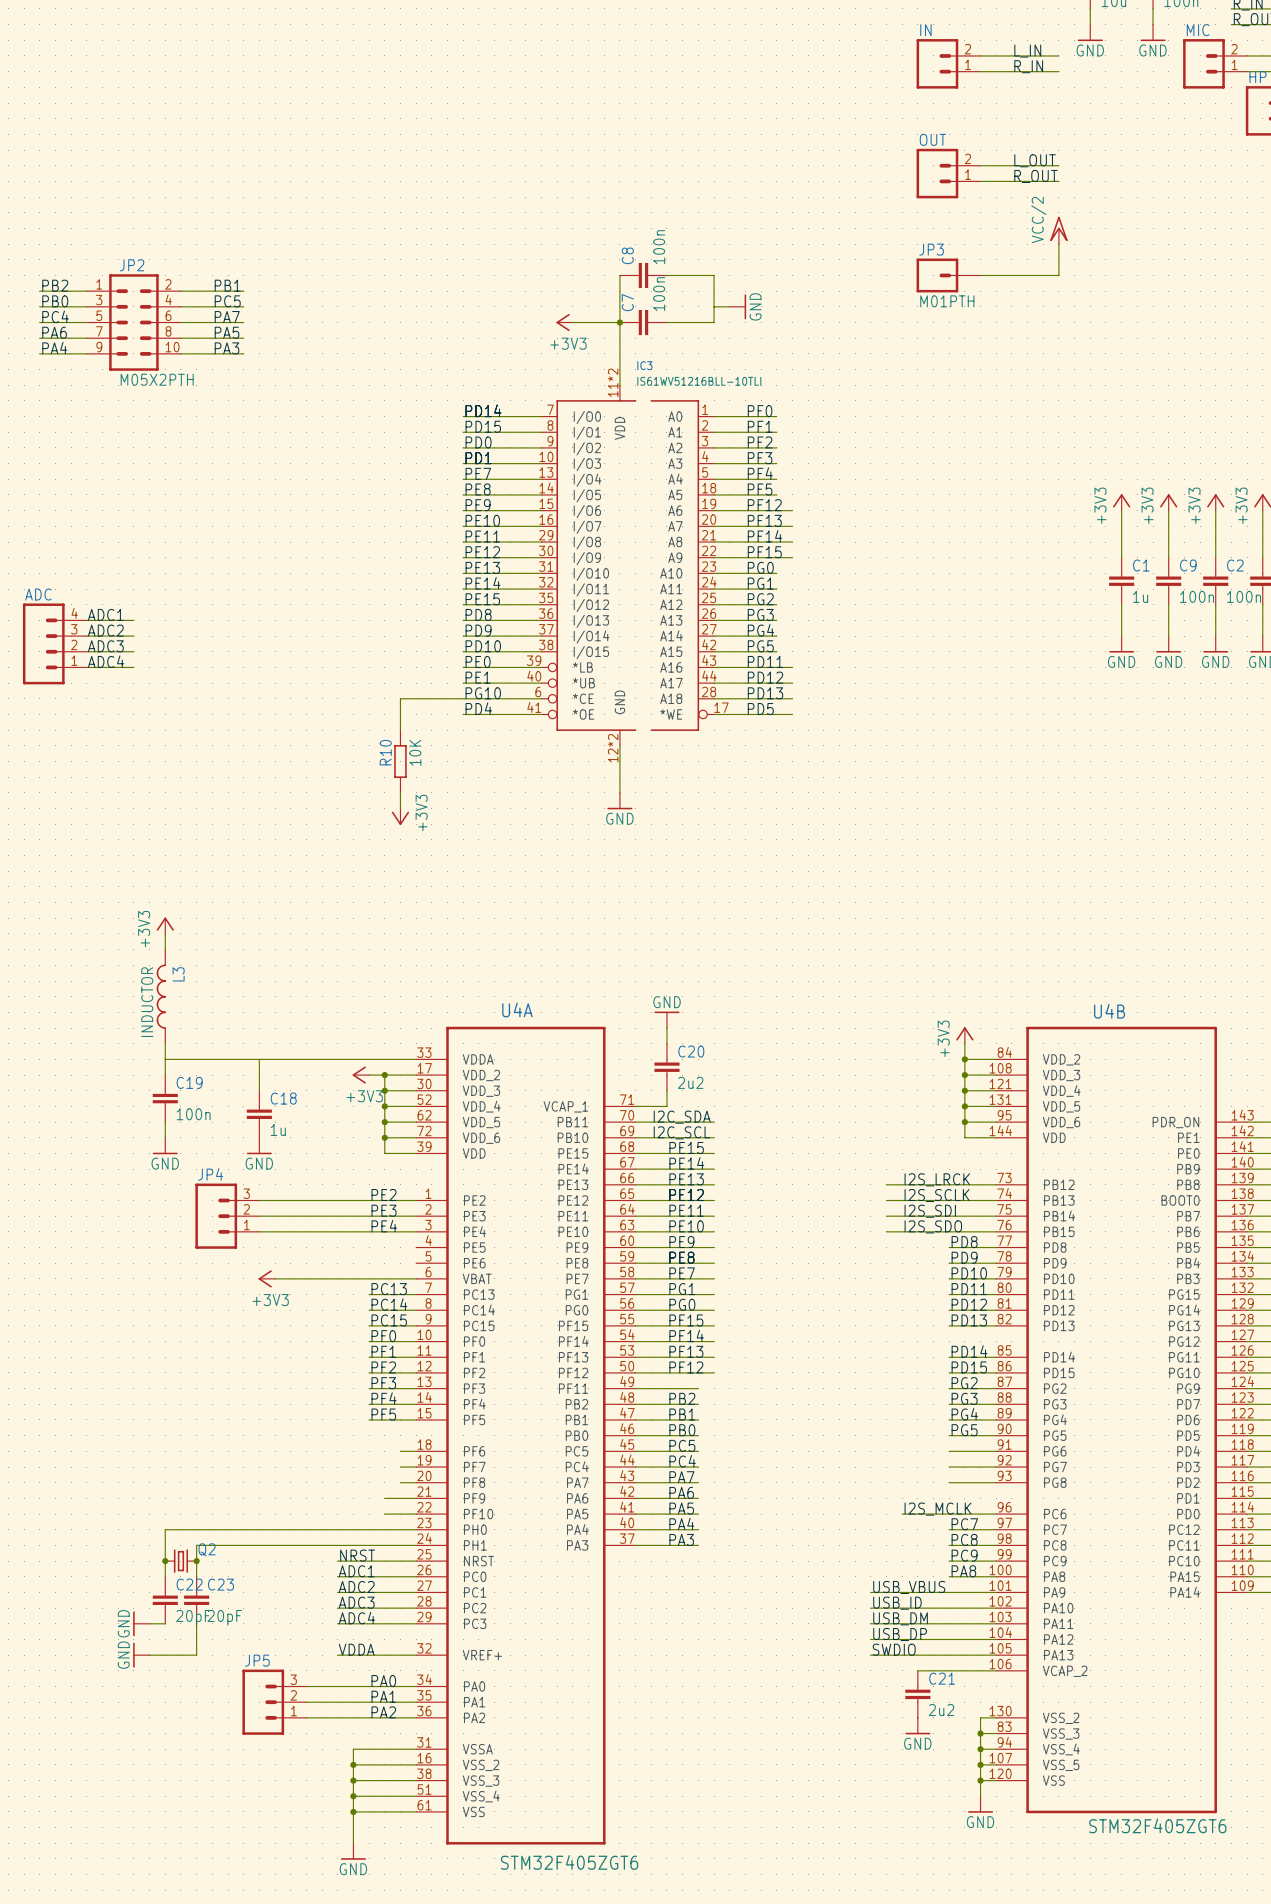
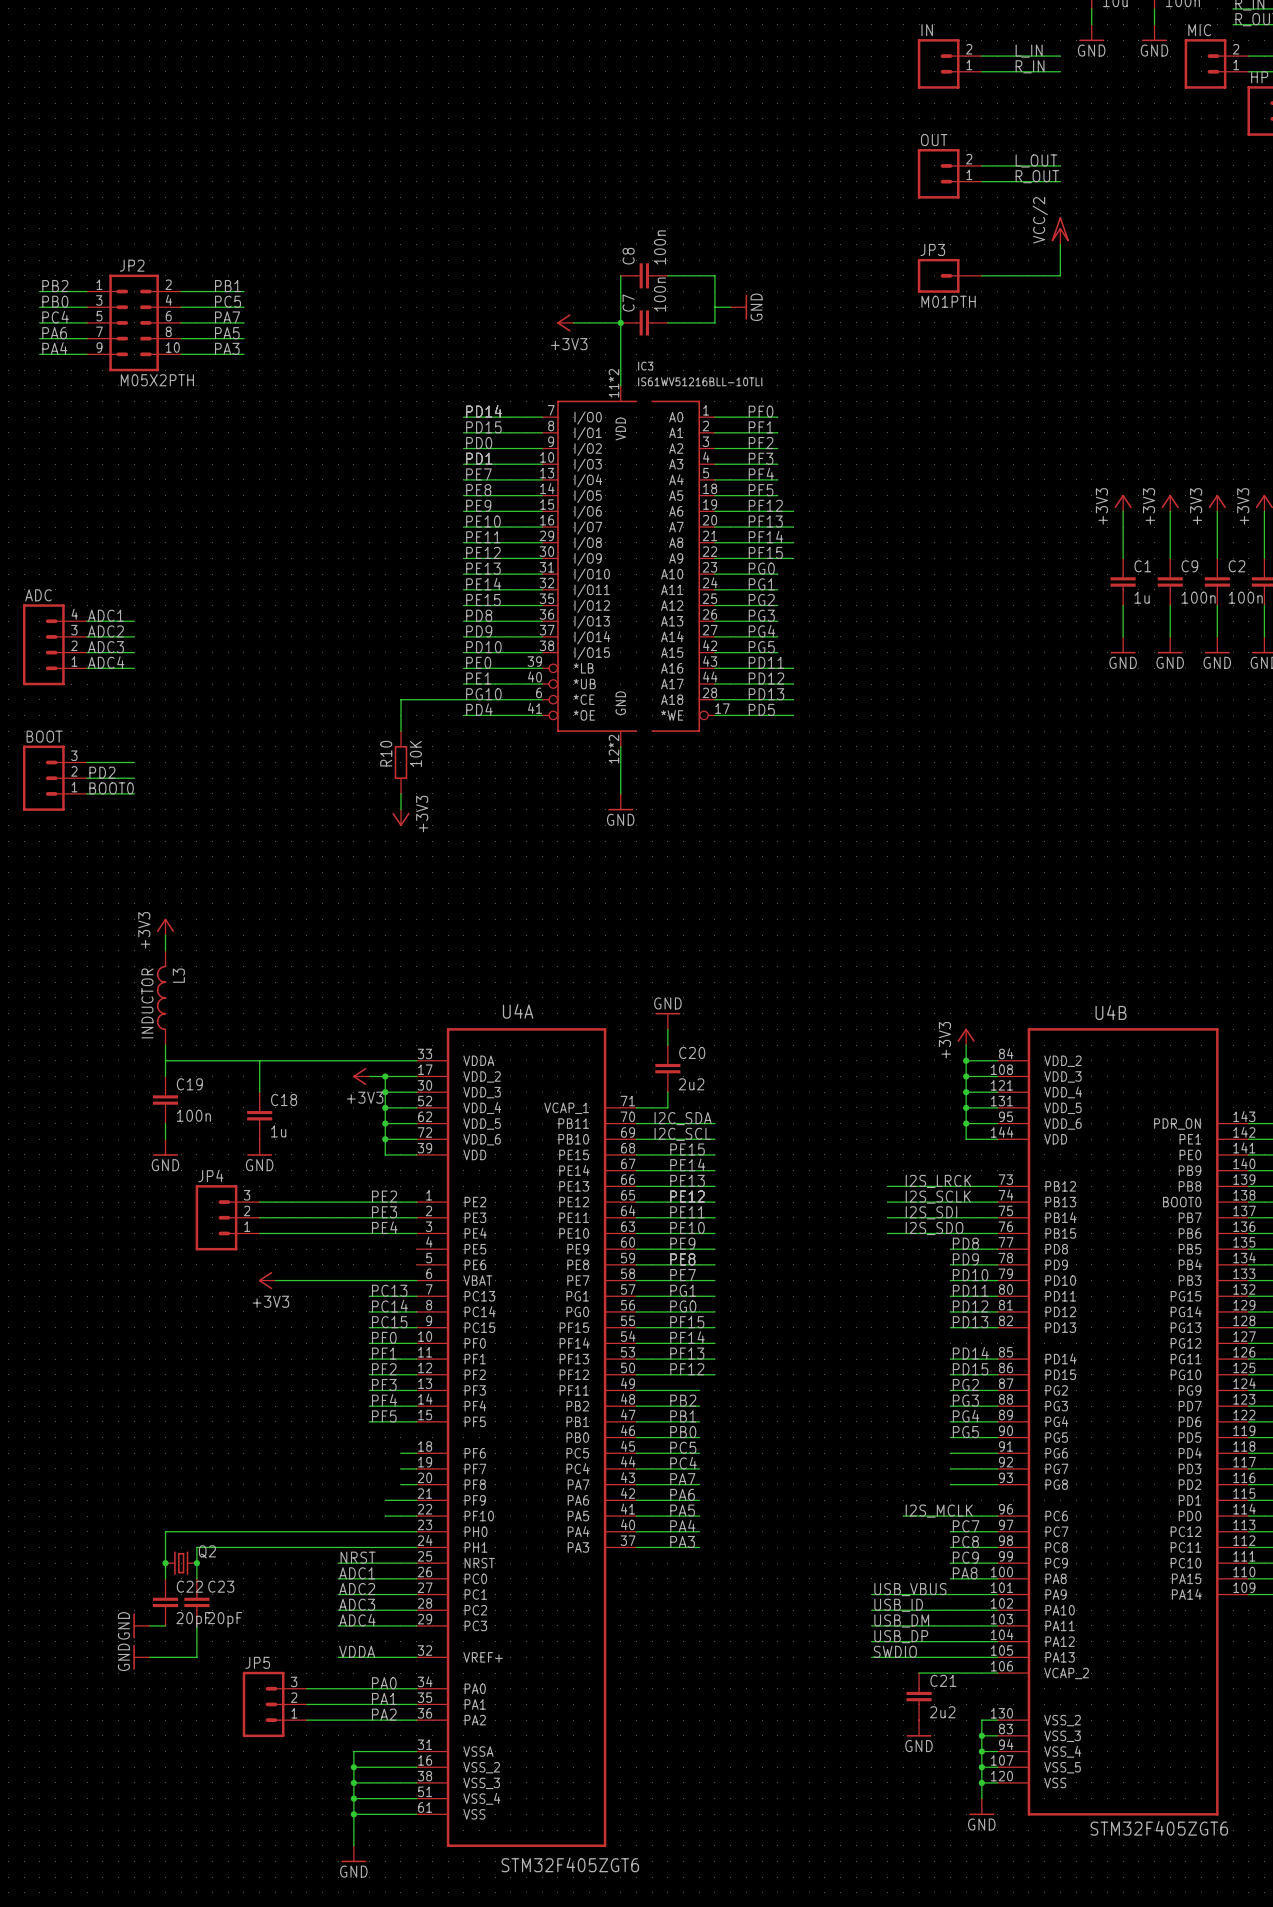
wire: none -> (87, 762) (134, 762)
label: none -> PD2 (102, 772)
BOOT: none -> (54, 778)
wire: none -> (87, 778) (134, 778)
label: none -> BOOT0 (111, 788)
wire: none -> (87, 793) (134, 793)

